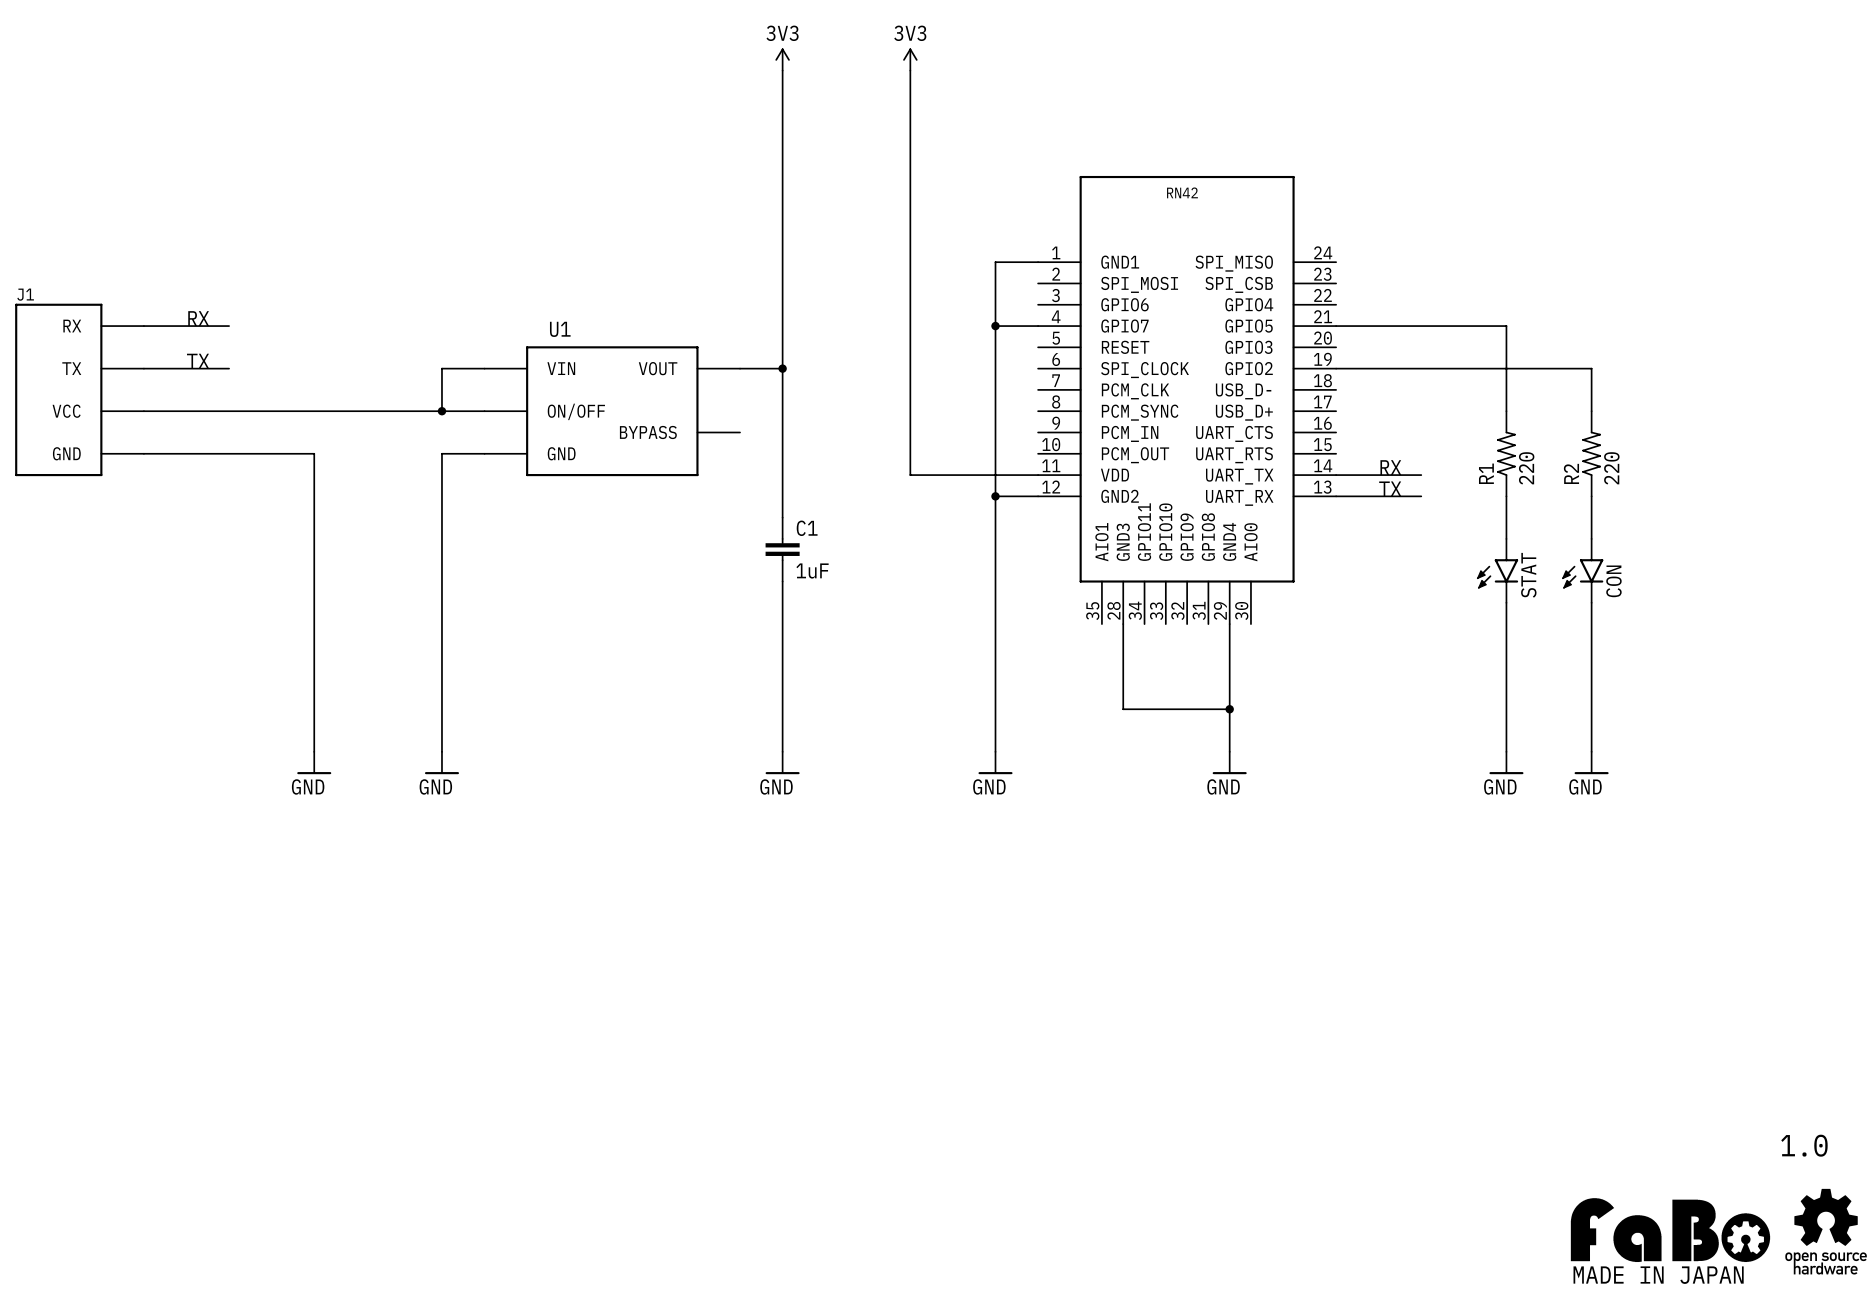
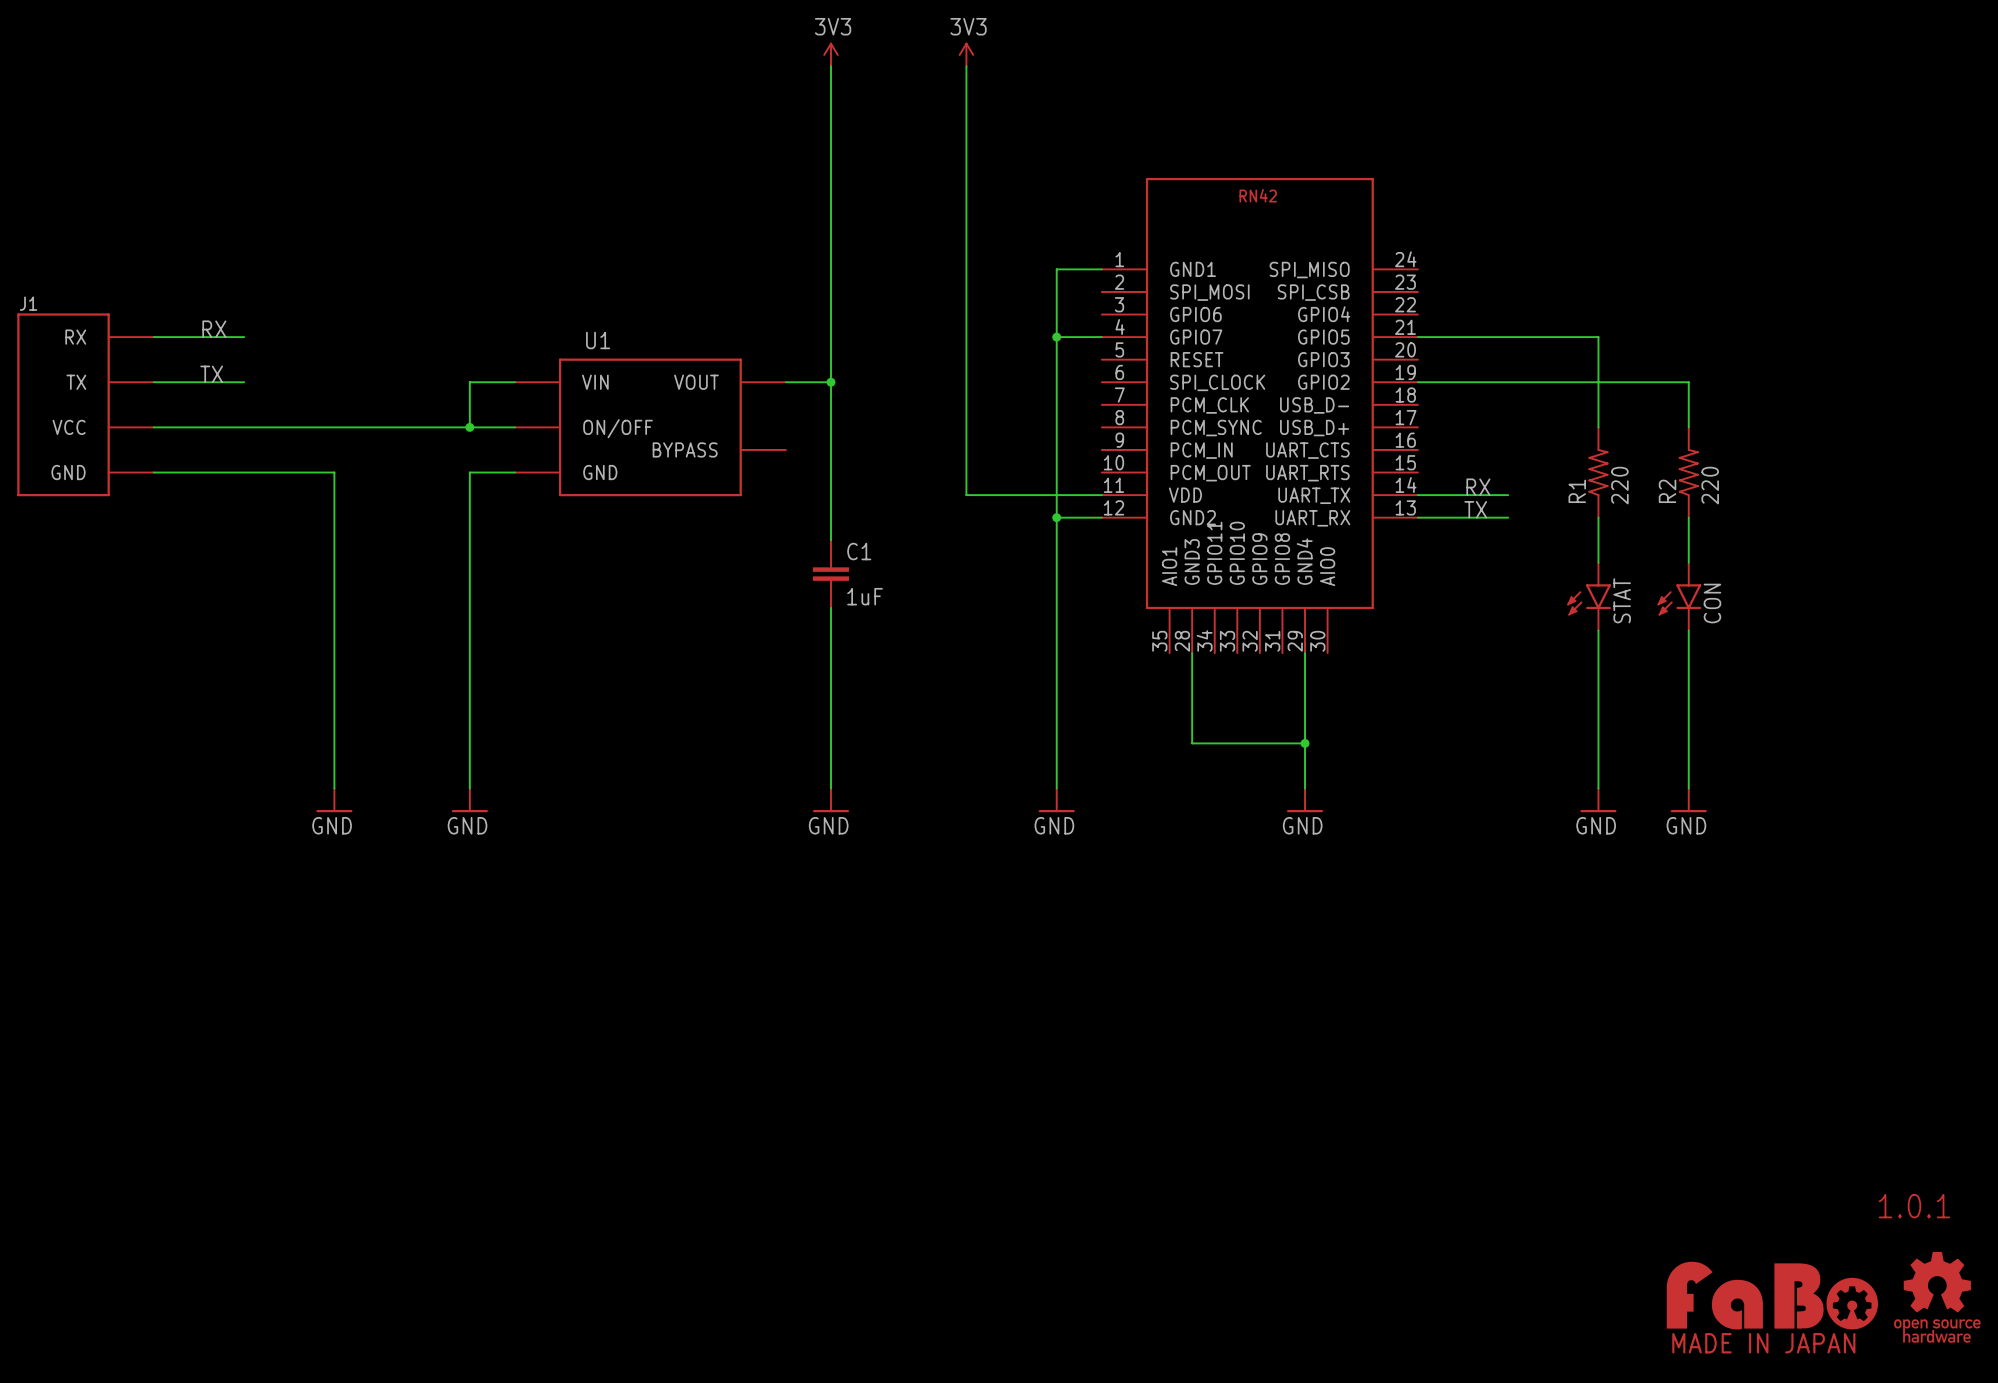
text: 1.0 (1804, 1145) -> 1.0.1 (1914, 1206)

